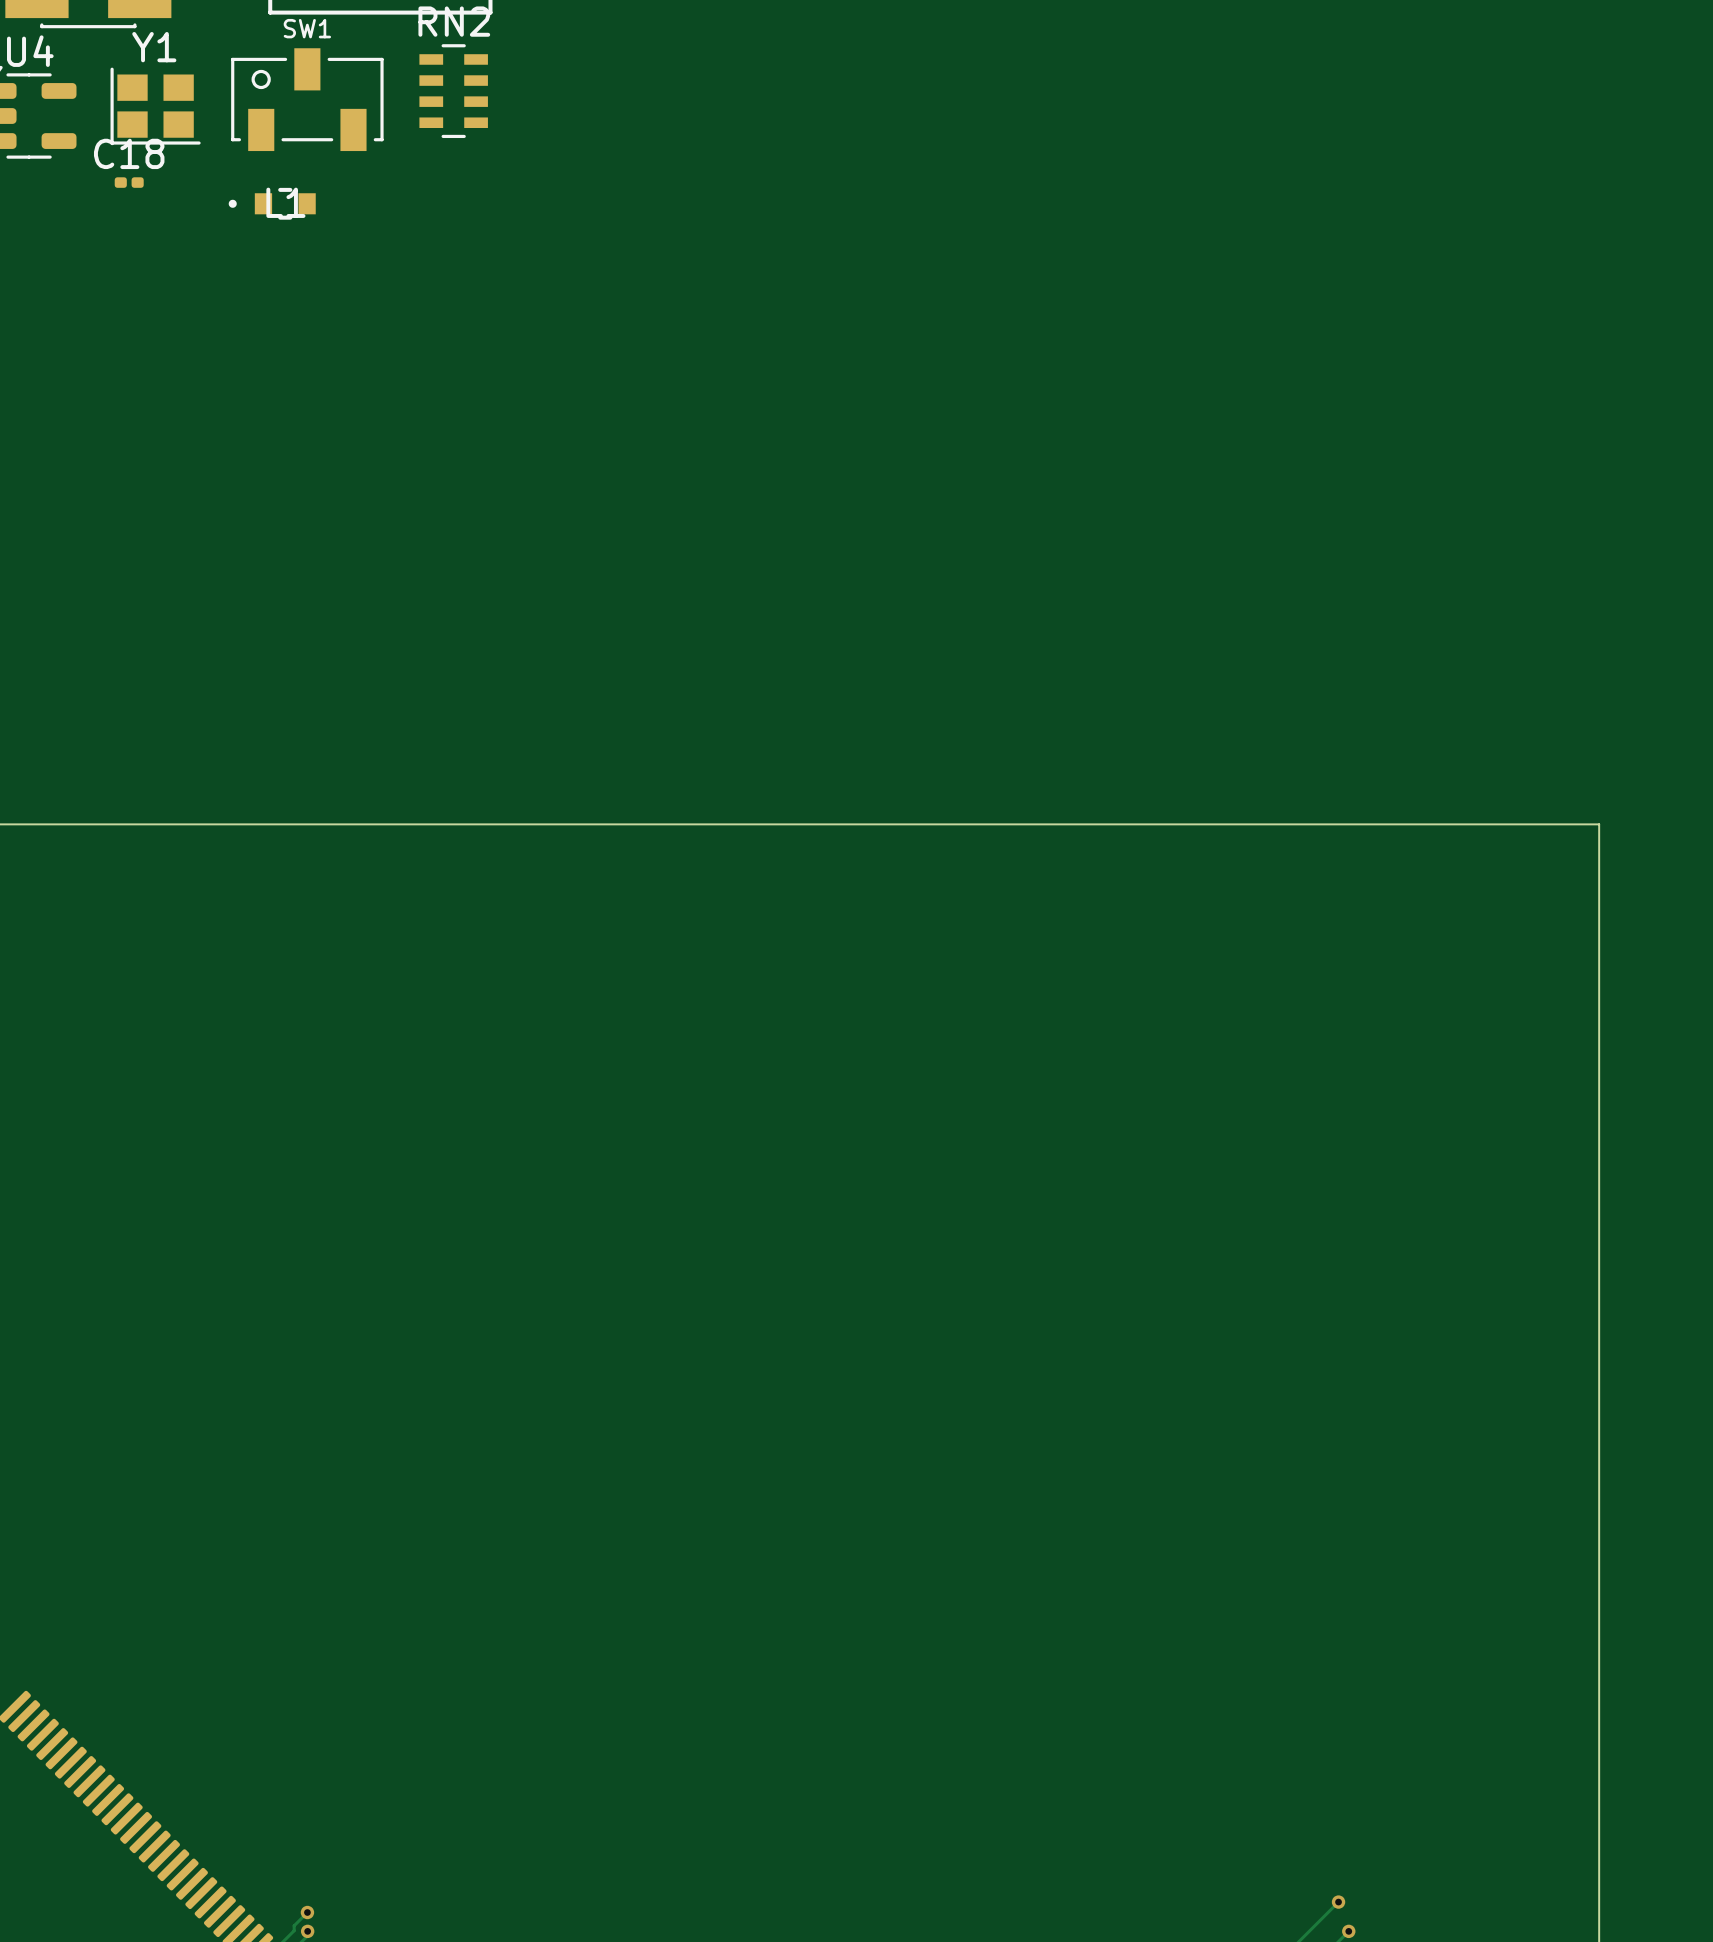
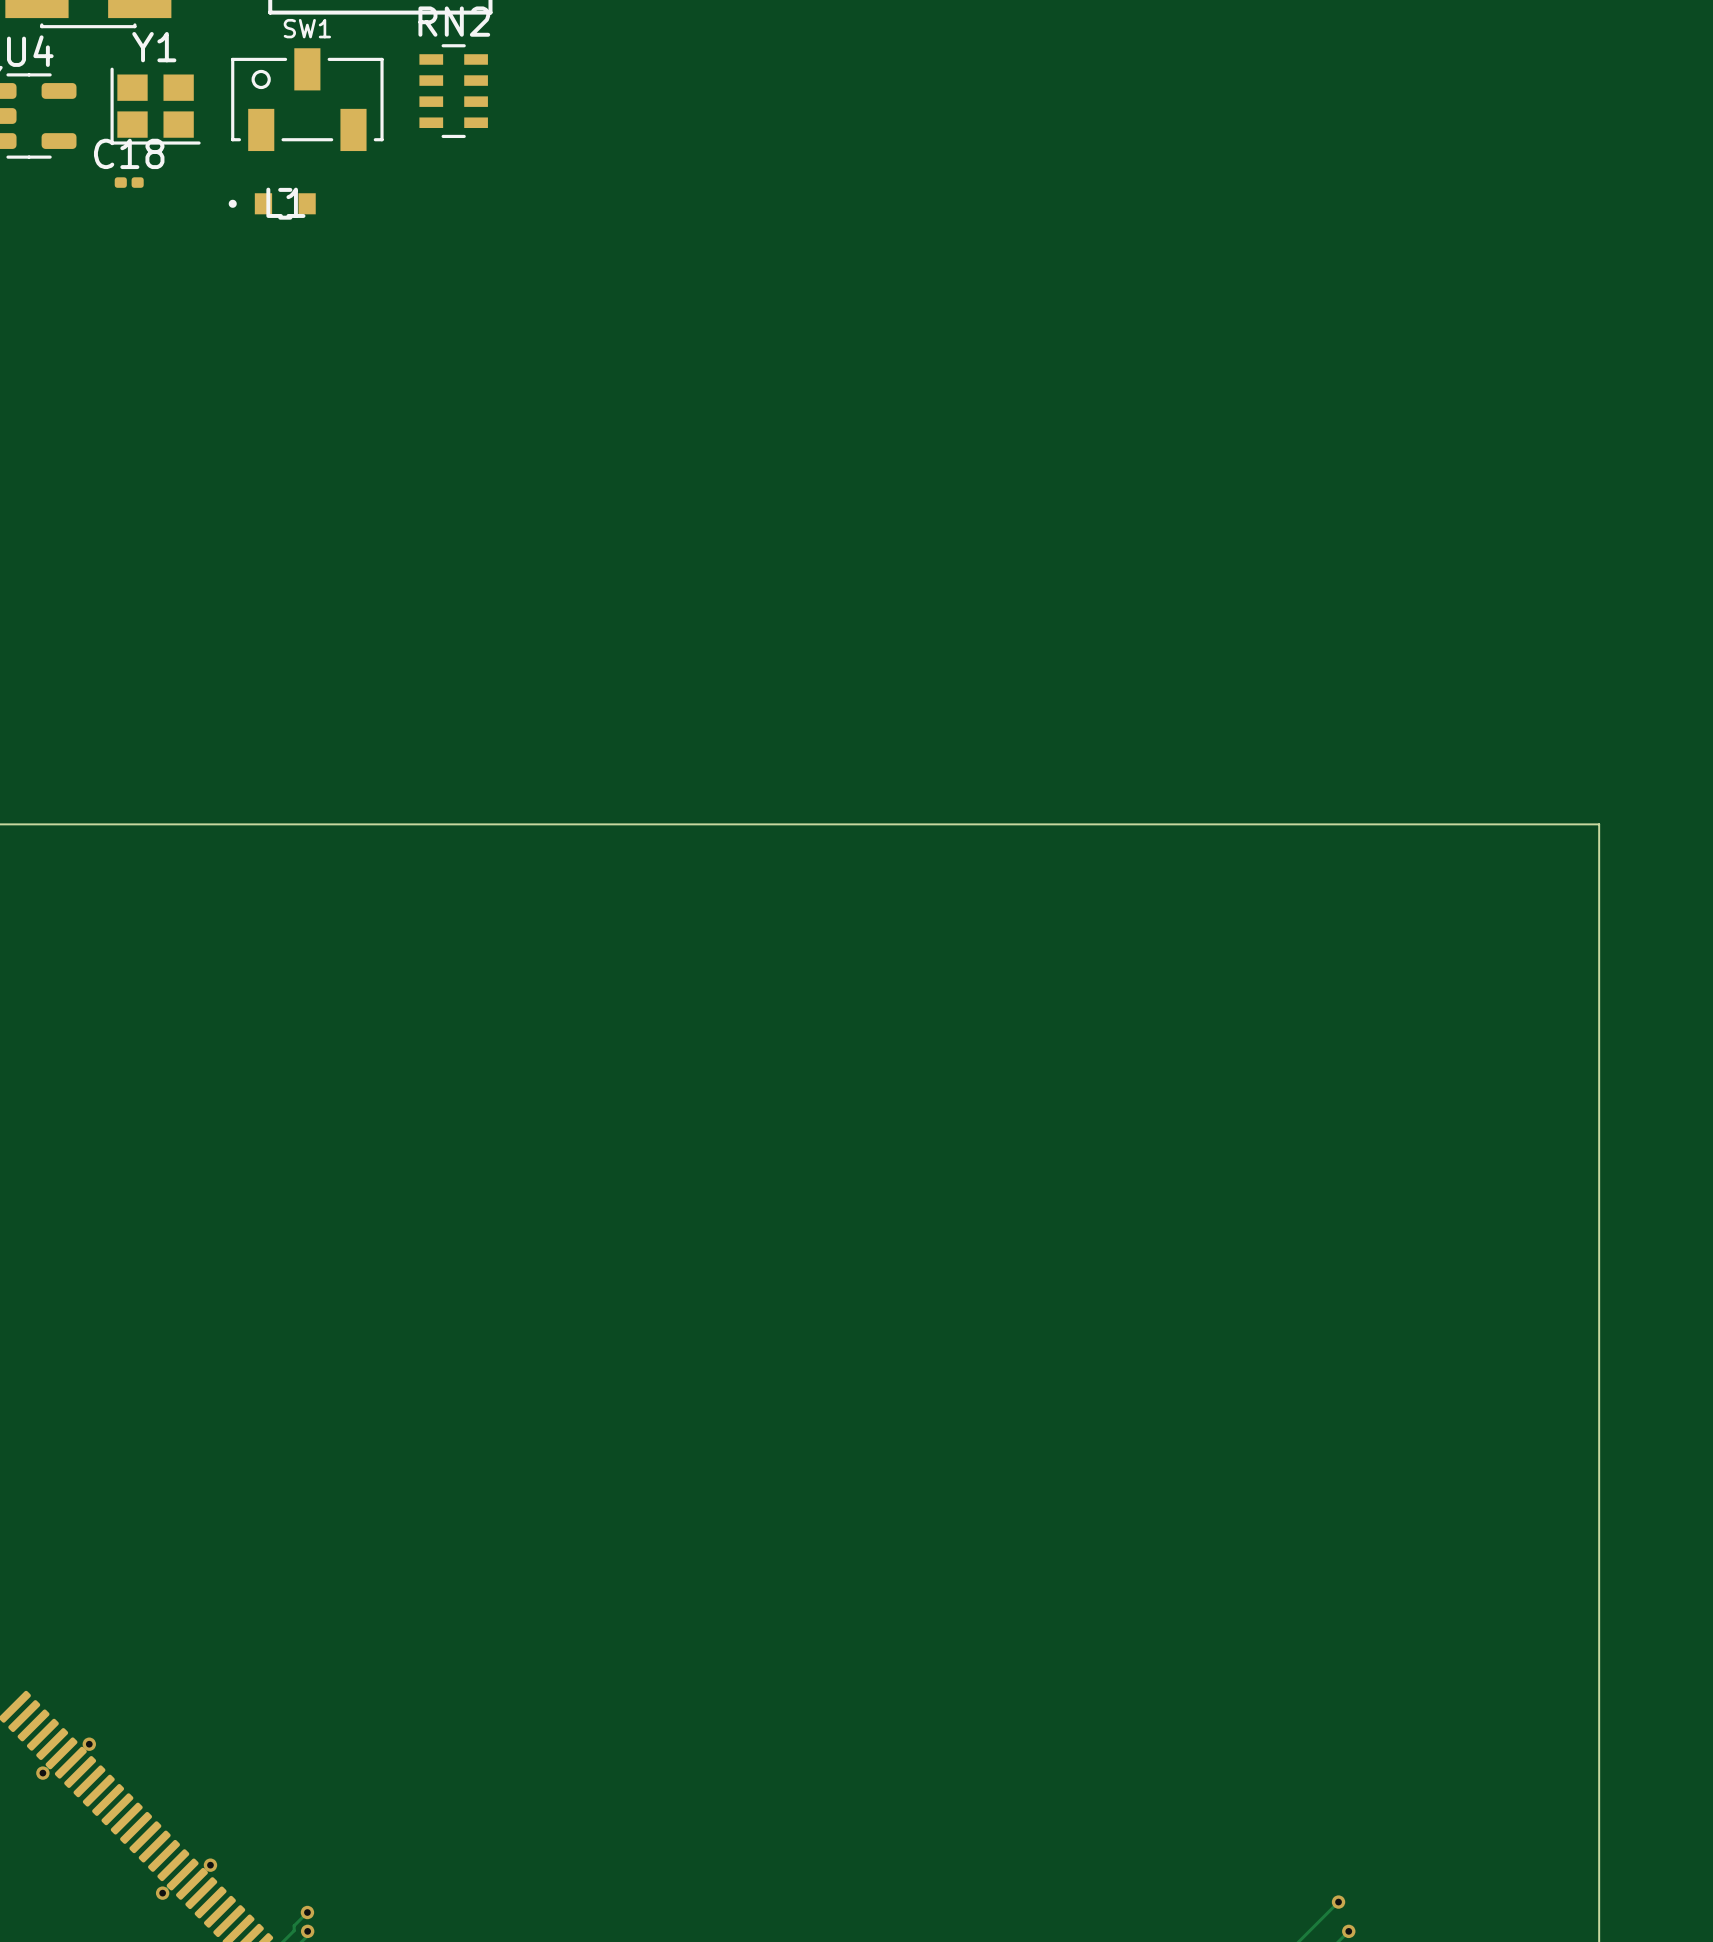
via: none -> (89, 1744)
via: none -> (42, 1773)
via: none -> (210, 1865)
via: none -> (162, 1893)

